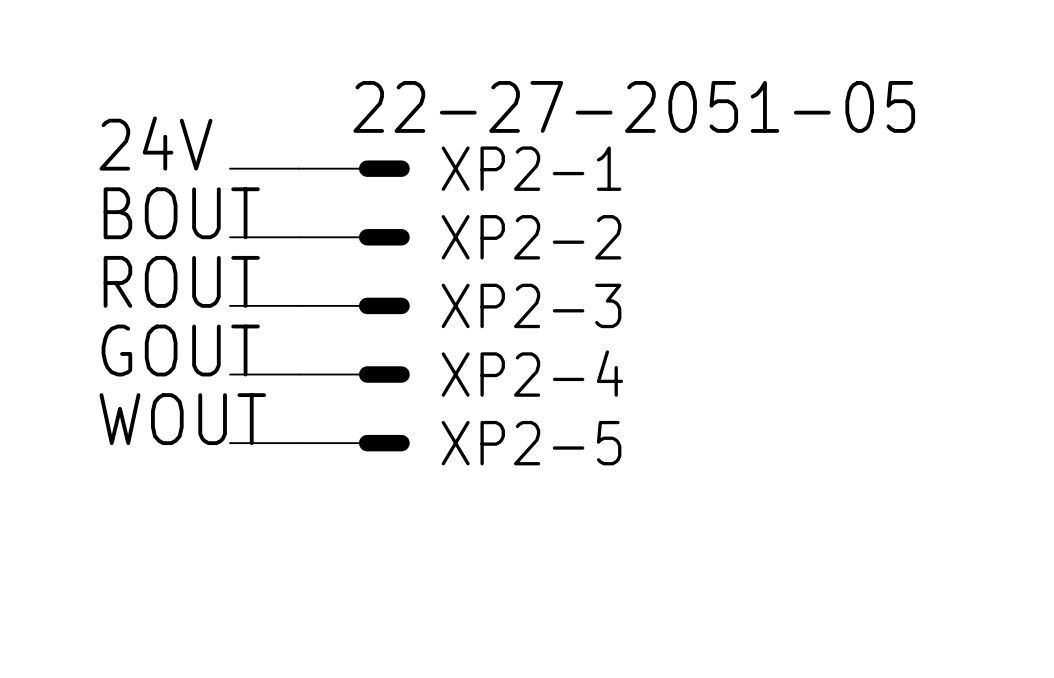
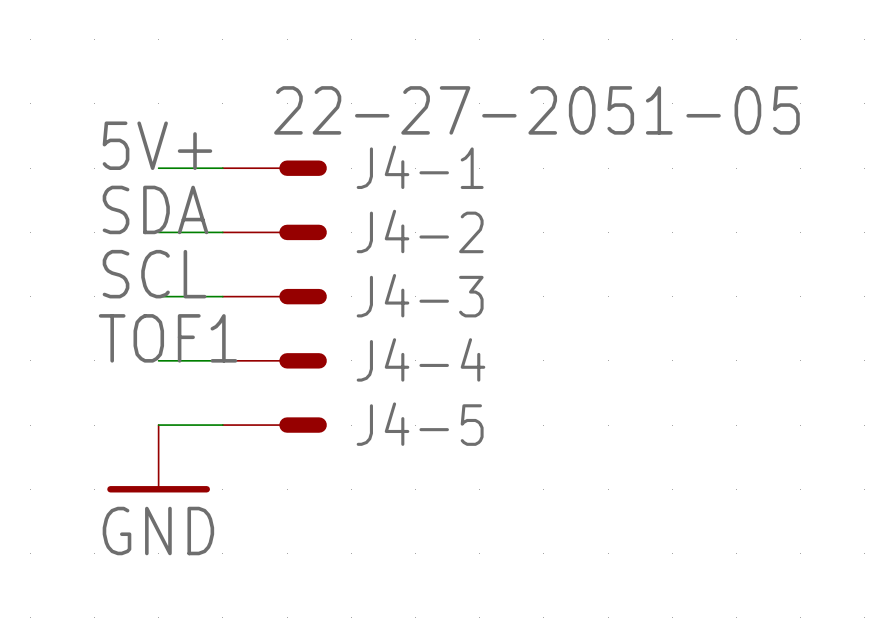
label: 24V (156, 143) -> none
label: none -> 5V+ (157, 145)
XP2-1 name: XP2-1 (531, 168) -> J4-1 (420, 167)
label: BOUT (181, 213) -> none
label: none -> SDA (155, 209)
XP2-2 name: XP2-2 (531, 237) -> J4-2 (420, 231)
label: ROUT (181, 281) -> none
label: none -> SCL (154, 274)
XP2-3 name: XP2-3 (531, 305) -> J4-3 (420, 295)
label: GOUT (180, 350) -> none
label: none -> TOF1 (168, 338)
XP2-4 name: XP2-4 (532, 373) -> J4-4 (420, 359)
label: WOUT (182, 419) -> none
XP2-5 name: XP2-5 (531, 443) -> J4-5 (420, 424)
power symbol: none -> GND (158, 458)

